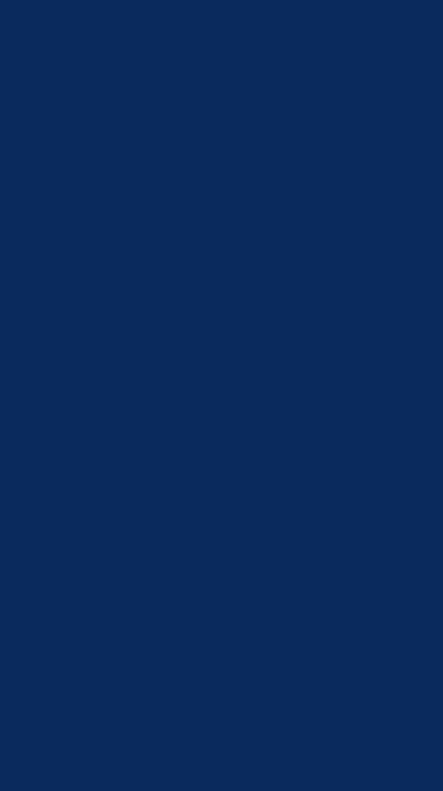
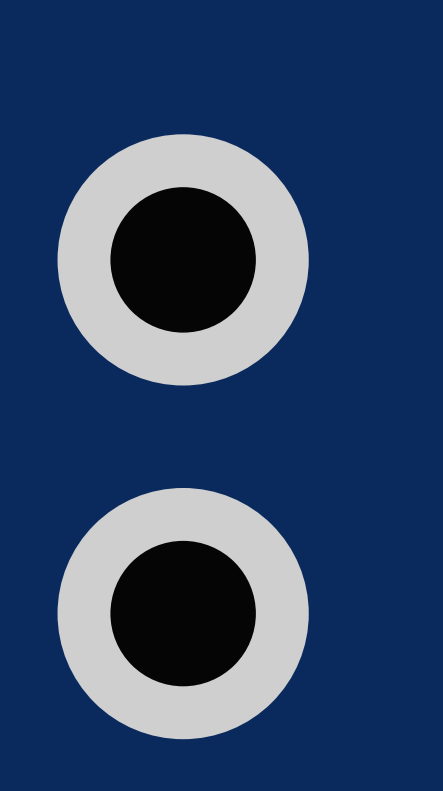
part: none -> (183, 259)
part: none -> (183, 613)

